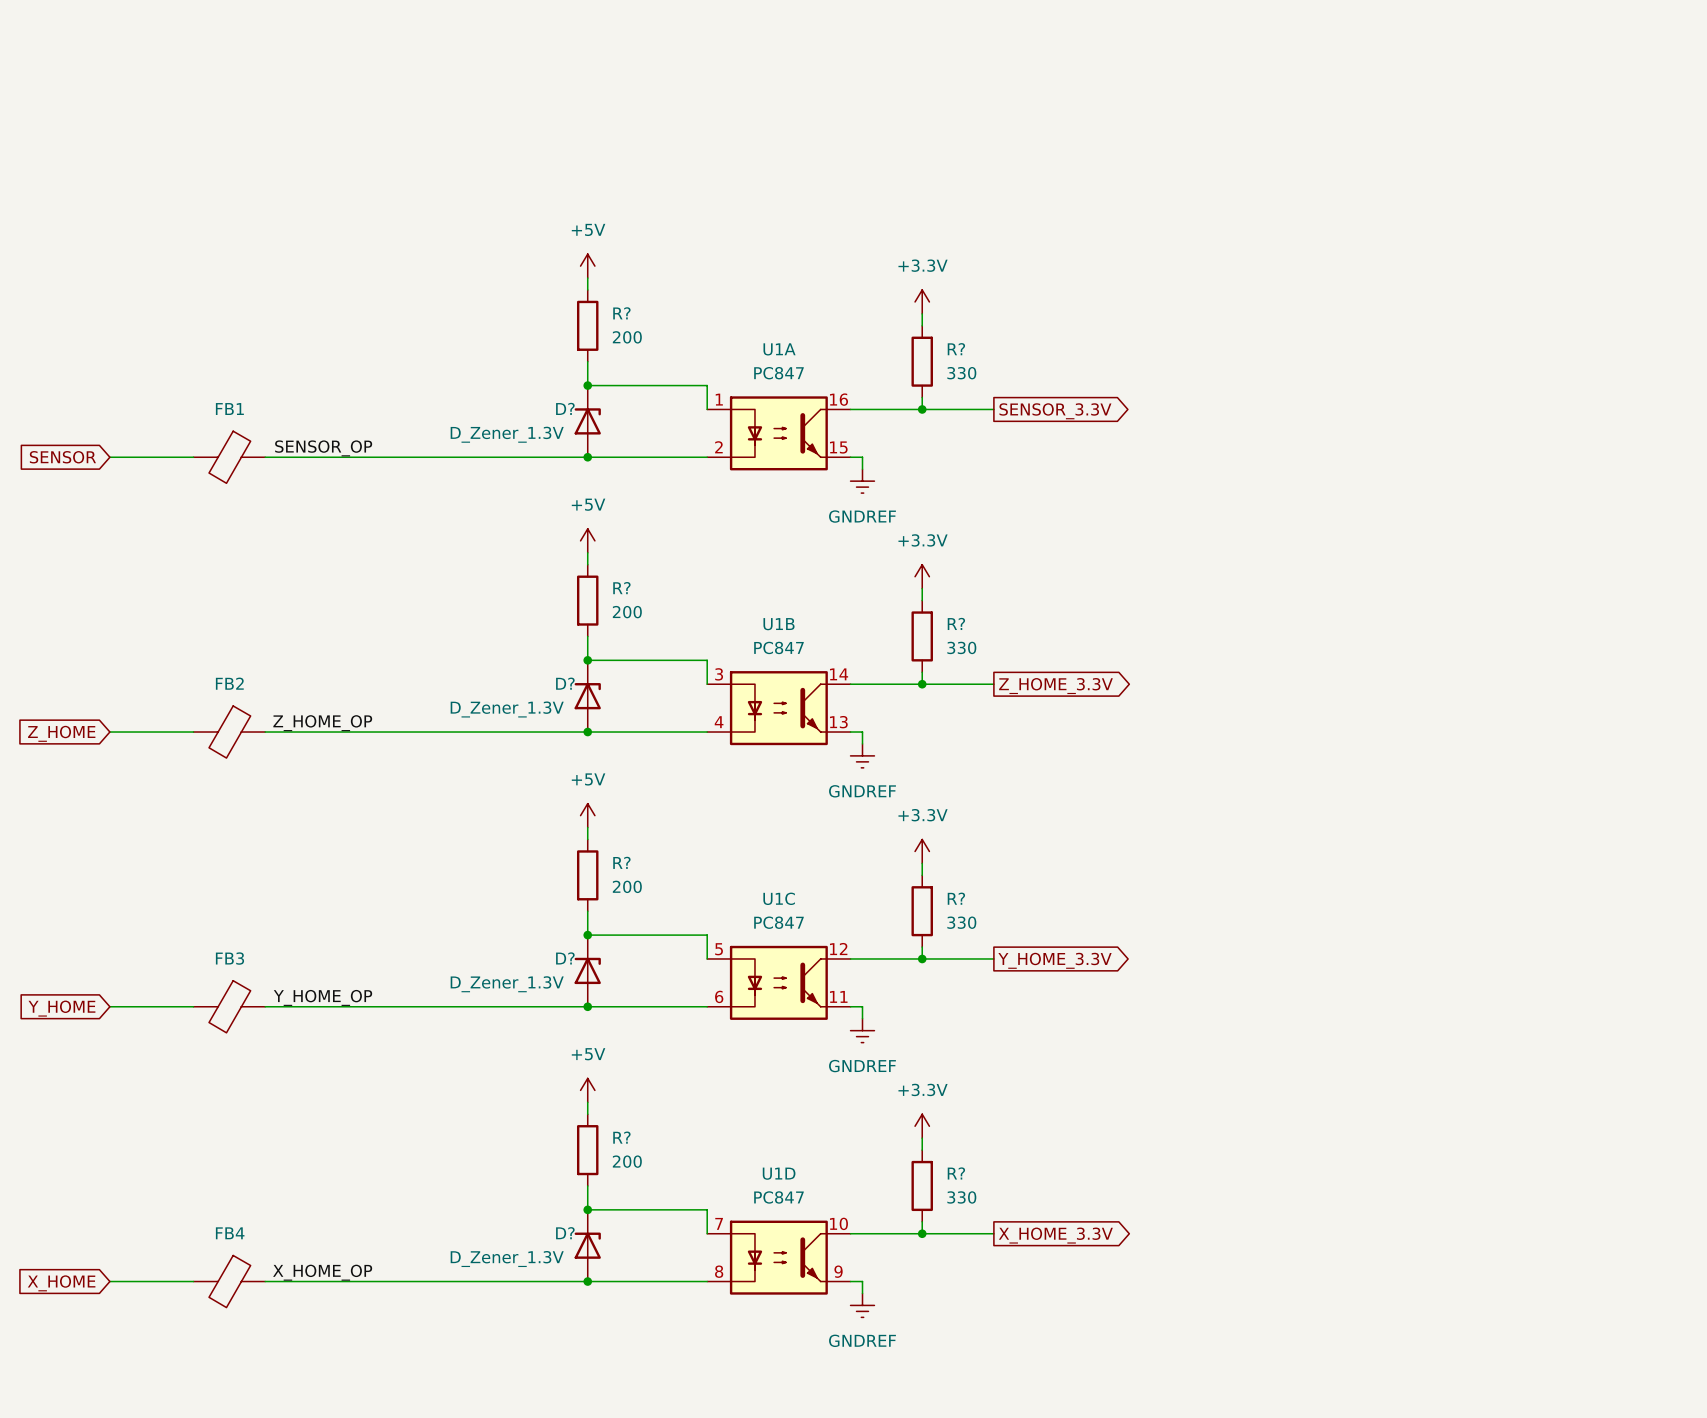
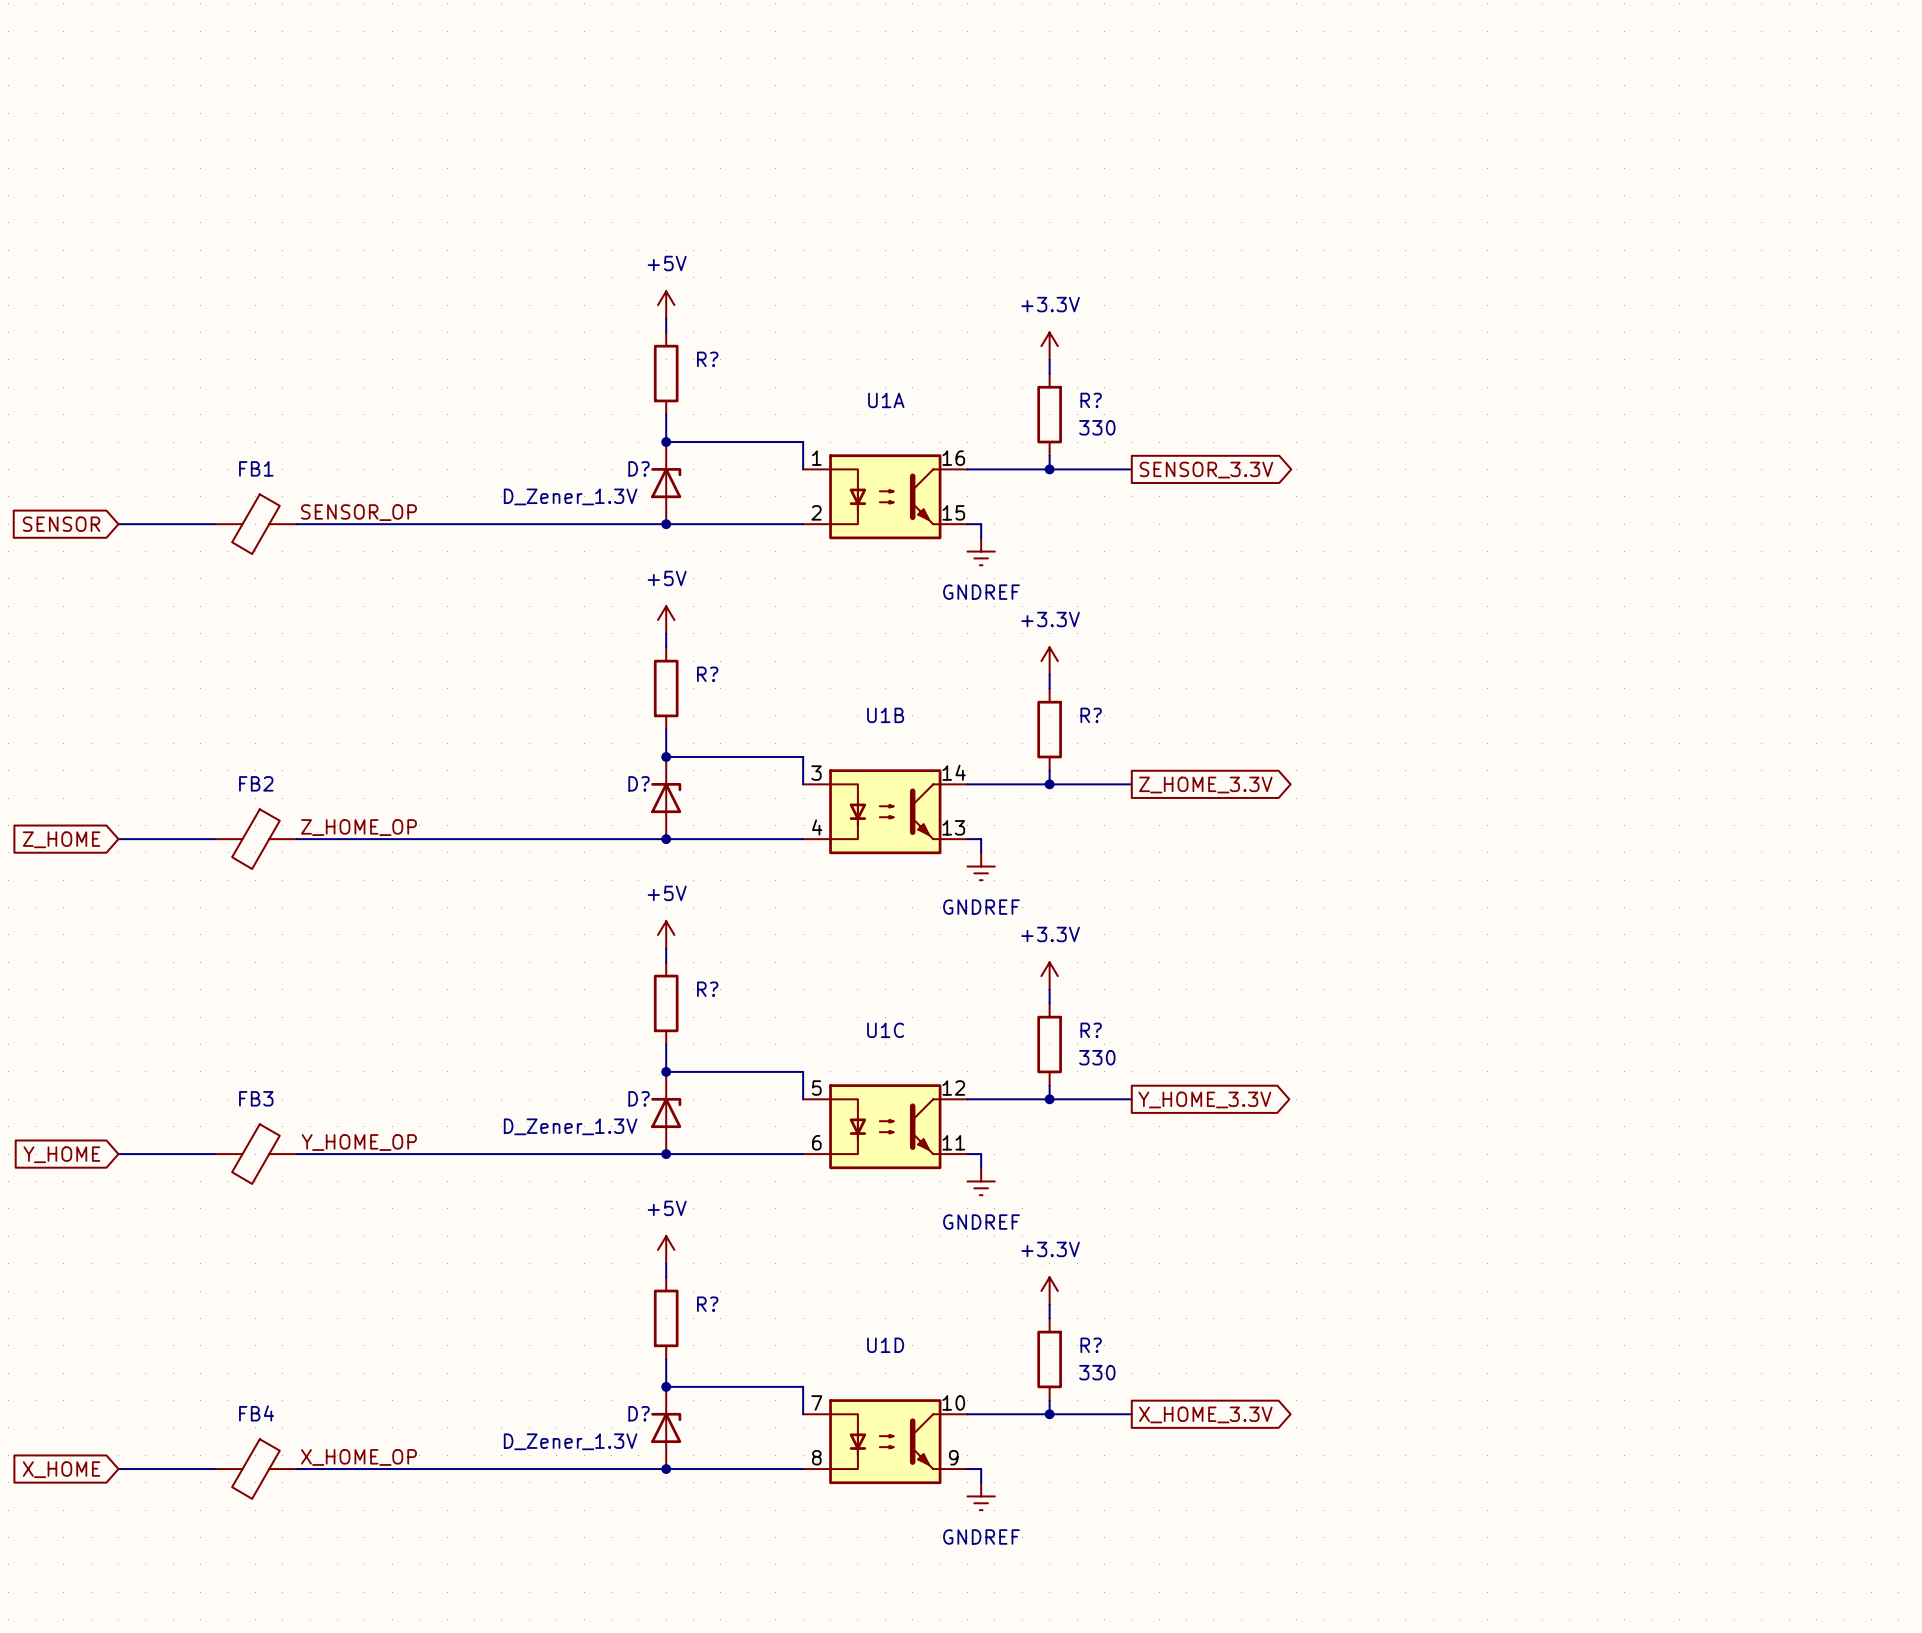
R? value: 200 (627, 337) -> none
U1A value: PC847 (778, 373) -> none
R? value: 200 (627, 612) -> none
U1B value: PC847 (778, 647) -> none
R? value: 330 (961, 647) -> none
D? value: D_Zener_1.3V (507, 709) -> none
R? value: 200 (627, 886) -> none
U1C value: PC847 (778, 922) -> none
R? value: 200 (627, 1161) -> none
U1D value: PC847 (778, 1197) -> none

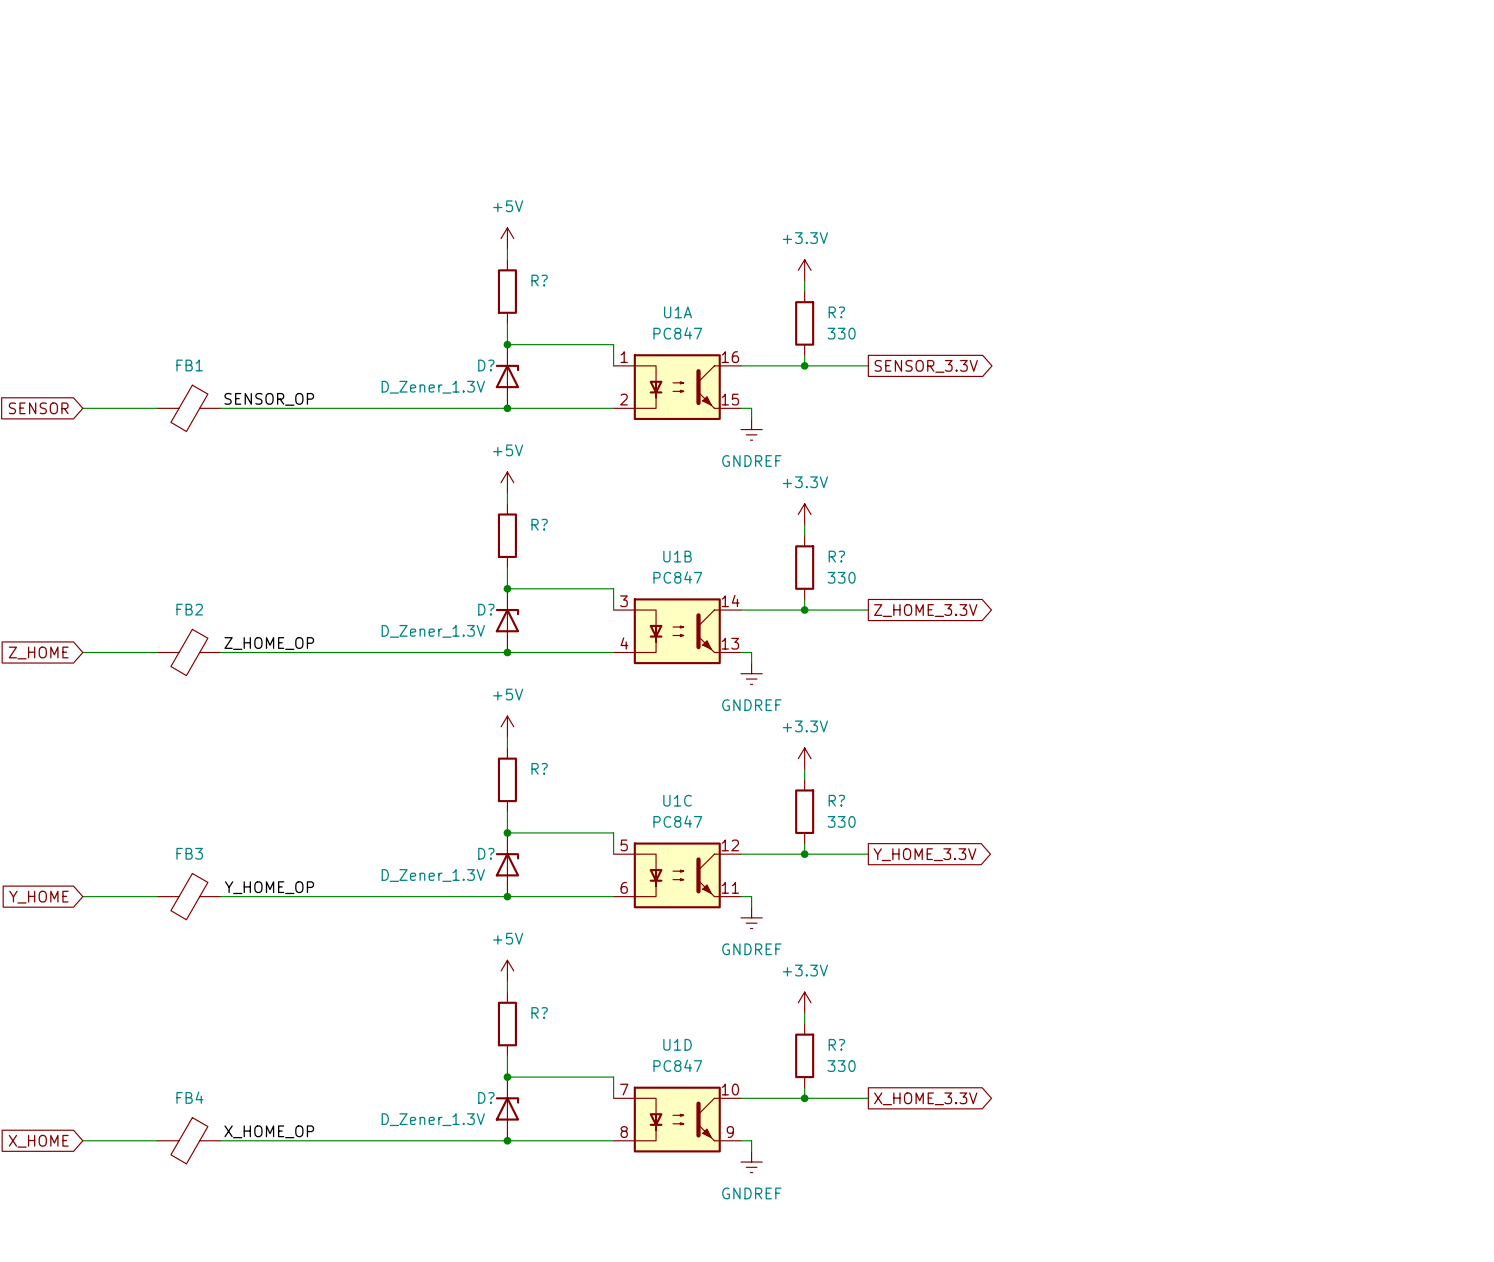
U1A value: none -> PC847 (677, 333)
U1B value: none -> PC847 (677, 577)
R? value: none -> 330 (841, 577)
D? value: none -> D_Zener_1.3V (433, 631)
U1C value: none -> PC847 (677, 821)
U1D value: none -> PC847 (677, 1065)

